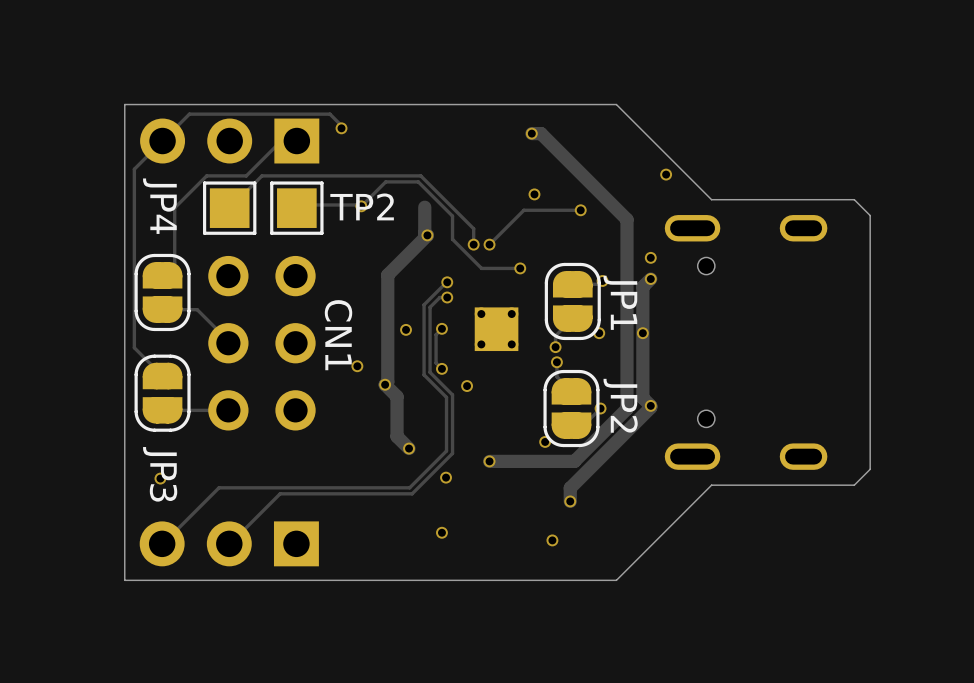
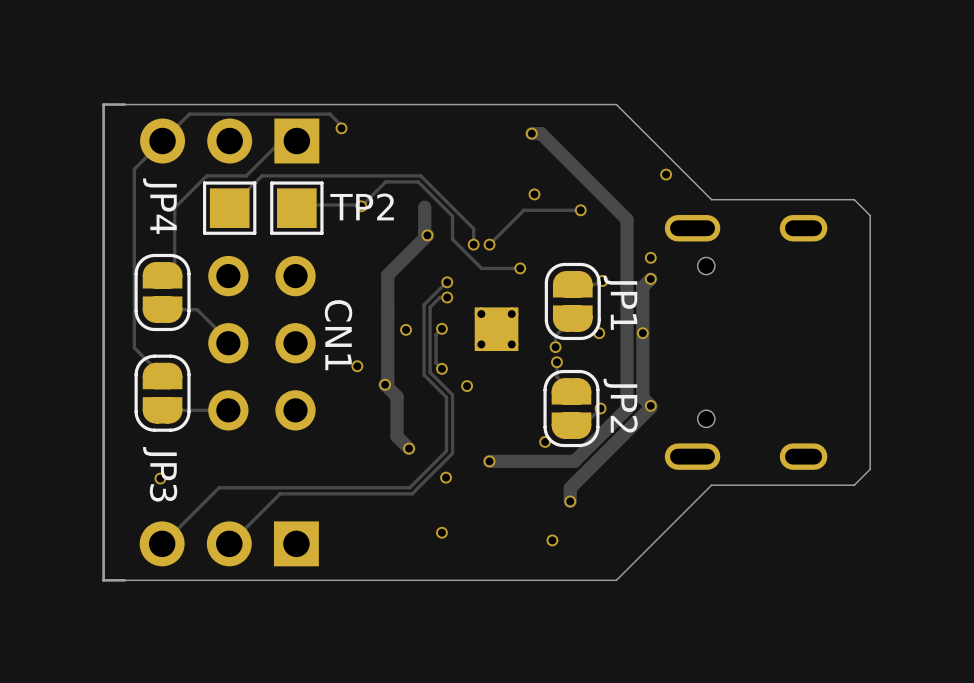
board edge: (124, 104) (124, 580) -> (124, 104) (103, 104) (103, 580) (124, 580)

